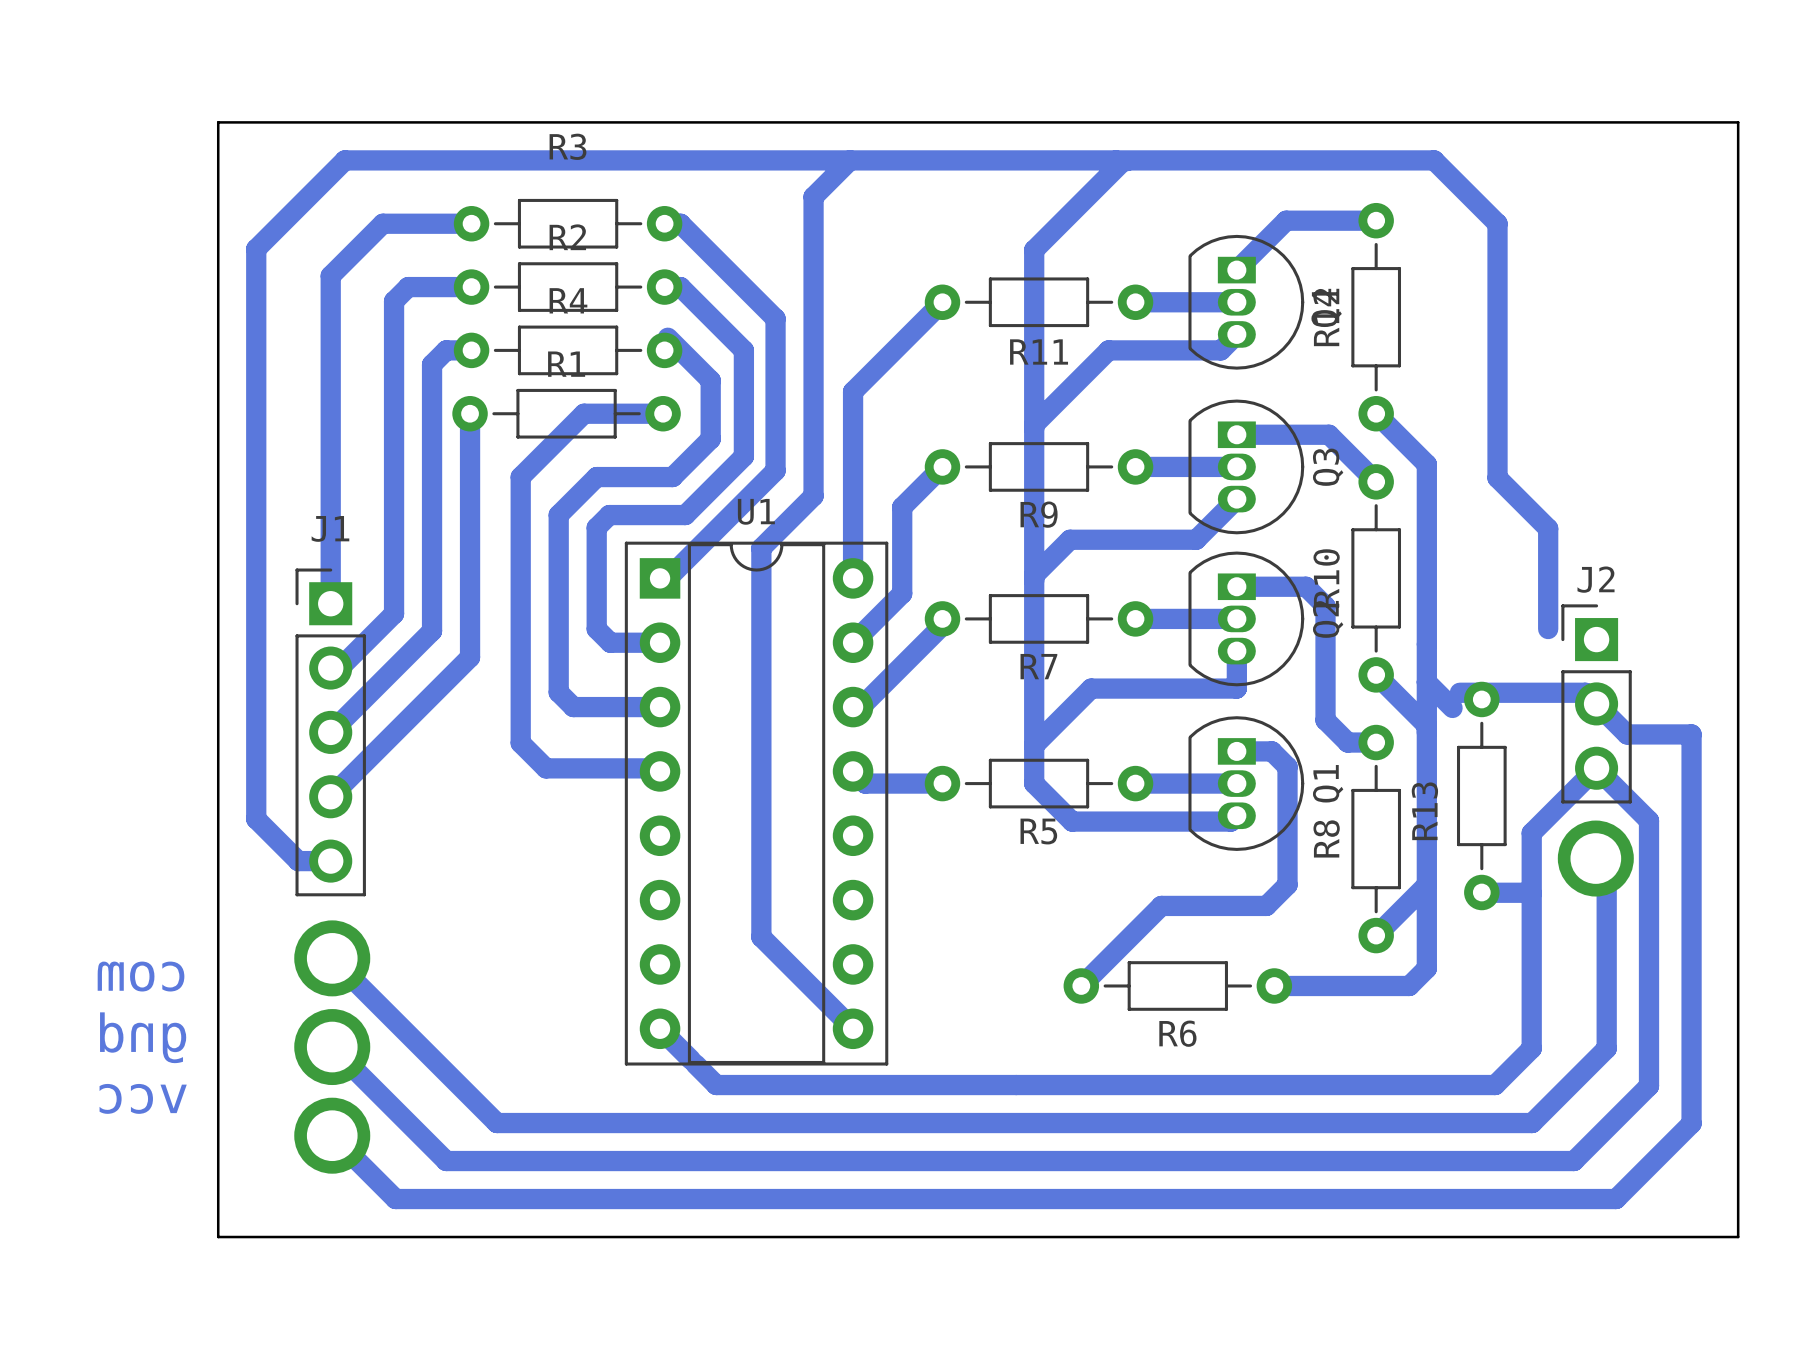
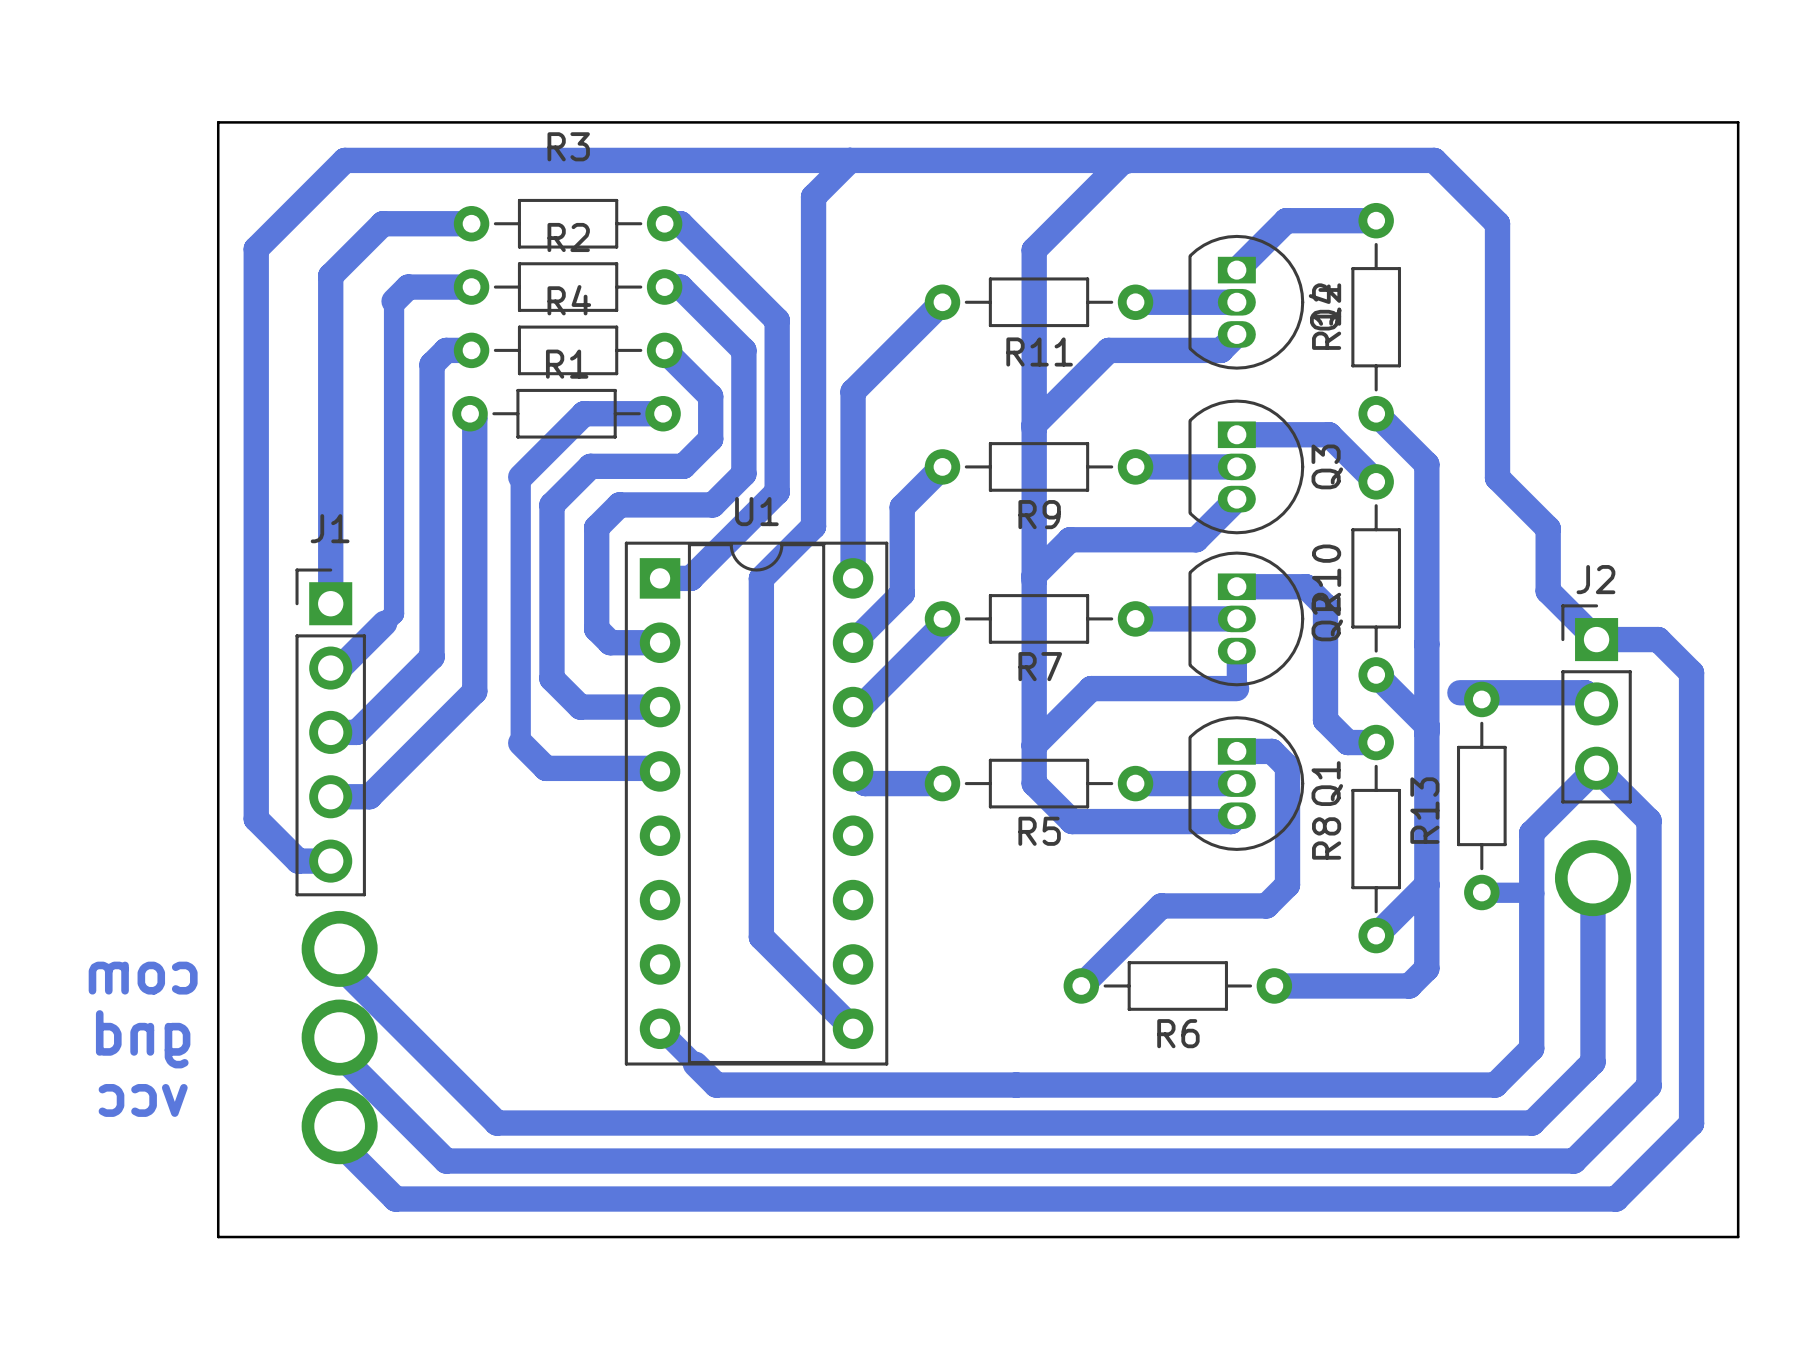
bottom track width: thin (850, 160) (813, 196) (813, 496) -> thick (850, 160) (813, 196) (813, 496)
bottom track width: thin (1126, 161) (1123, 161) (1034, 250) (1034, 783) (1072, 821) (1231, 821) (1236, 815) -> thick (1126, 161) (1123, 161) (1034, 250) (1034, 783) (1072, 821) (1231, 821) (1236, 815)
bottom track width: thin (1376, 220) (1286, 220) (1236, 270) -> thick (1376, 220) (1286, 220) (1236, 270)
bottom track width: thin (471, 223) (382, 223) (330, 275) (330, 603) -> thick (471, 223) (382, 223) (330, 275) (330, 603)
bottom track width: thin (664, 223) (680, 223) (775, 318) -> thick (664, 223) (680, 223) (775, 318)
bottom track width: thin (471, 287) (408, 287) (394, 301) -> thick (471, 287) (408, 287) (394, 301)
bottom track width: thin (664, 287) (680, 287) (743, 350) (743, 456) -> thick (664, 287) (680, 287) (743, 350) (743, 456)
bottom track width: thin (942, 302) (853, 391) (853, 578) -> thick (942, 302) (853, 391) (853, 578)
bottom track width: thin (1135, 302) (1236, 302) -> thick (1135, 302) (1236, 302)
bottom track: (775, 318) (775, 470) (667, 578) -> (775, 318) (777, 320) (777, 492) (690, 578) (667, 578)
bottom track width: thin (1236, 334) (1220, 350) (1108, 350) (1034, 424) -> thick (1236, 334) (1220, 350) (1108, 350) (1034, 424)
bottom track: (667, 337) (710, 380) (710, 396) -> (664, 350) (710, 396)
bottom track width: thin (471, 350) (446, 350) (432, 364) (432, 631) -> thick (471, 350) (446, 350) (432, 364) (432, 631)
bottom track width: thin (710, 396) (710, 439) (683, 466) -> thick (710, 396) (710, 439) (683, 466)
bottom track: (470, 413) (470, 657) (330, 796) -> (470, 413) (474, 418) (474, 691) (369, 796) (330, 796)
bottom track width: thin (663, 413) (584, 413) (520, 477) -> thick (663, 413) (584, 413) (520, 477)
bottom track width: thin (1376, 413) (1426, 464) (1426, 968) (1409, 985) (1274, 985) -> thick (1376, 413) (1426, 464) (1426, 968) (1409, 985) (1274, 985)
bottom track width: thin (1236, 434) (1329, 434) (1376, 481) -> thick (1236, 434) (1329, 434) (1376, 481)
bottom track: (743, 456) (685, 515) (609, 515) -> (743, 456) (743, 473) (712, 504) (619, 504) (609, 515)
bottom track: (683, 466) (672, 477) (596, 477) (558, 515) (558, 692) (573, 707) (580, 707) -> (683, 466) (590, 466) (551, 504) (551, 678) (580, 707)
bottom track width: thin (942, 466) (902, 507) (902, 593) (853, 642) -> thick (942, 466) (902, 507) (902, 593) (853, 642)
bottom track width: thin (1135, 466) (1236, 466) -> thick (1135, 466) (1236, 466)
bottom track: (813, 496) (761, 548) (761, 578) -> (813, 496) (813, 526) (761, 578)
bottom track width: thin (1236, 499) (1196, 539) (1070, 539) (1034, 575) -> thick (1236, 499) (1196, 539) (1070, 539) (1034, 575)
bottom track width: thin (609, 515) (596, 527) (596, 629) (610, 642) (660, 642) -> thick (609, 515) (596, 527) (596, 629) (610, 642) (660, 642)
bottom track width: thin (761, 578) (761, 937) (853, 1028) -> thick (761, 578) (761, 937) (853, 1028)
bottom track width: thin (1236, 586) (1306, 586) (1325, 606) (1325, 720) (1347, 742) (1376, 742) -> thick (1236, 586) (1306, 586) (1325, 606) (1325, 720) (1347, 742) (1376, 742)
bottom track: (1548, 591) (1548, 629) -> none
bottom track width: thin (1548, 591) (1548, 528) (1497, 477) (1497, 223) (1434, 160) (344, 160) (256, 249) (256, 819) (298, 861) (330, 861) -> thick (1548, 591) (1548, 528) (1497, 477) (1497, 223) (1434, 160) (344, 160) (256, 249) (256, 819) (298, 861) (330, 861)
bottom track width: thin (942, 618) (942, 625) (860, 707) (853, 707) -> thick (942, 618) (942, 625) (860, 707) (853, 707)
bottom track width: thin (1135, 618) (1236, 618) -> thick (1135, 618) (1236, 618)
bottom track width: thin (384, 623) (339, 668) (330, 668) -> thick (384, 623) (339, 668) (330, 668)
bottom track: (432, 631) (330, 732) -> (432, 631) (432, 657) (356, 732) (330, 732)
bottom track width: thin (1381, 674) (1376, 674) (1426, 725) -> thick (1381, 674) (1376, 674) (1426, 725)
bottom track: (1426, 682) (1452, 707) -> none
bottom track width: thin (1236, 688) (1091, 688) (1034, 745) -> thick (1236, 688) (1091, 688) (1034, 745)
bottom track width: thin (1459, 692) (1585, 692) (1596, 703) -> thick (1459, 692) (1585, 692) (1596, 703)
bottom track: (1596, 703) (1627, 734) (1691, 734) -> (1548, 591) (1596, 639) (1658, 639) (1691, 672) (1691, 734)
bottom track width: thin (580, 707) (660, 707) -> thick (580, 707) (660, 707)
bottom track width: thin (1691, 734) (1691, 1123) (1616, 1199) (395, 1199) (332, 1135) -> thick (1691, 734) (1691, 1123) (1616, 1199) (395, 1199) (332, 1135)
bottom track width: thin (520, 743) (546, 768) (657, 768) (660, 771) -> thick (520, 743) (546, 768) (657, 768) (660, 771)
bottom track width: thin (1236, 751) (1272, 751) (1287, 766) (1287, 884) (1266, 905) (1161, 905) (1081, 985) -> thick (1236, 751) (1272, 751) (1287, 766) (1287, 884) (1266, 905) (1161, 905) (1081, 985)
bottom track width: thin (856, 768) (853, 771) (865, 783) (942, 783) -> thick (856, 768) (853, 771) (865, 783) (942, 783)
bottom track width: thin (1135, 783) (1236, 783) -> thick (1135, 783) (1236, 783)
bottom track: (1595, 858) (1606, 869) (1606, 1048) (1592, 1062) -> (1592, 878) (1592, 1062)
via position: (1595, 858) -> (1592, 878)
bottom track width: thin (1426, 884) (1376, 935) -> thick (1426, 884) (1376, 935)
bottom track width: thin (332, 958) (496, 1123) (1532, 1123) (1592, 1062) -> thick (332, 958) (496, 1123) (1532, 1123) (1592, 1062)
via position: (332, 958) -> (339, 948)
bottom track width: thin (332, 1047) (446, 1161) (1574, 1161) (1649, 1086) (1649, 820) (1596, 768) (1531, 833) (1531, 1048) (1495, 1085) (716, 1085) (695, 1064) -> thick (332, 1047) (446, 1161) (1574, 1161) (1649, 1086) (1649, 820) (1596, 768) (1531, 833) (1531, 1048) (1495, 1085) (716, 1085) (695, 1064)
via position: (332, 1047) -> (339, 1037)
via position: (332, 1135) -> (339, 1126)

